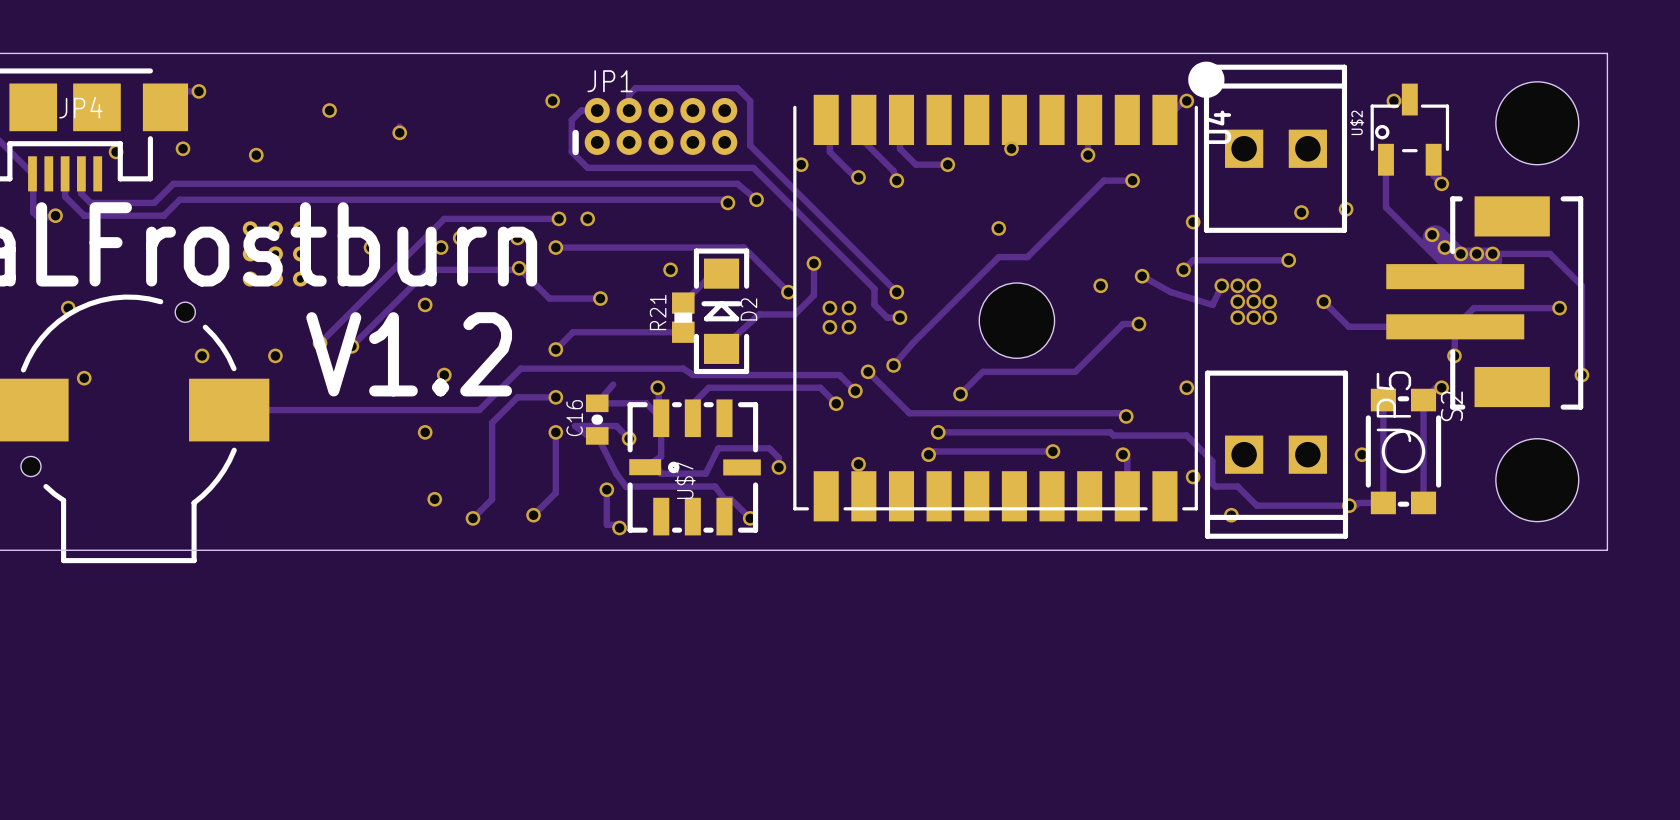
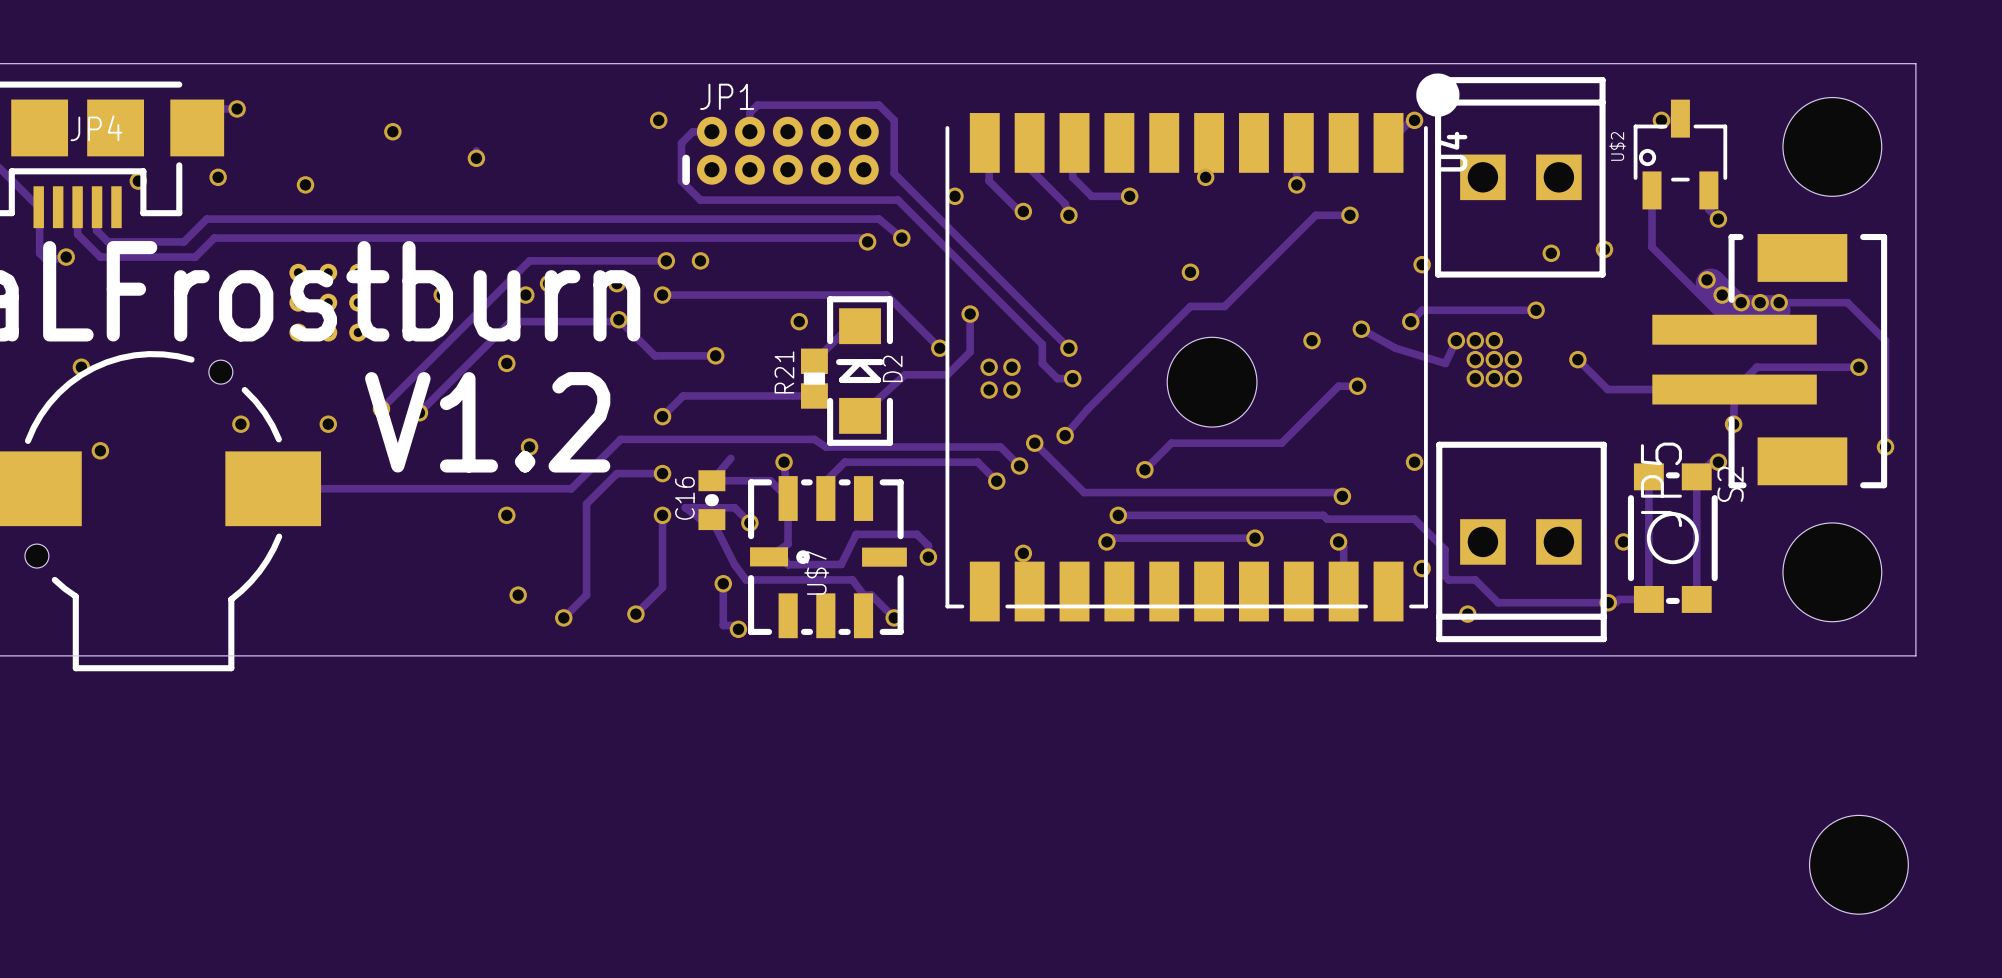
part: none -> (1858, 864)

